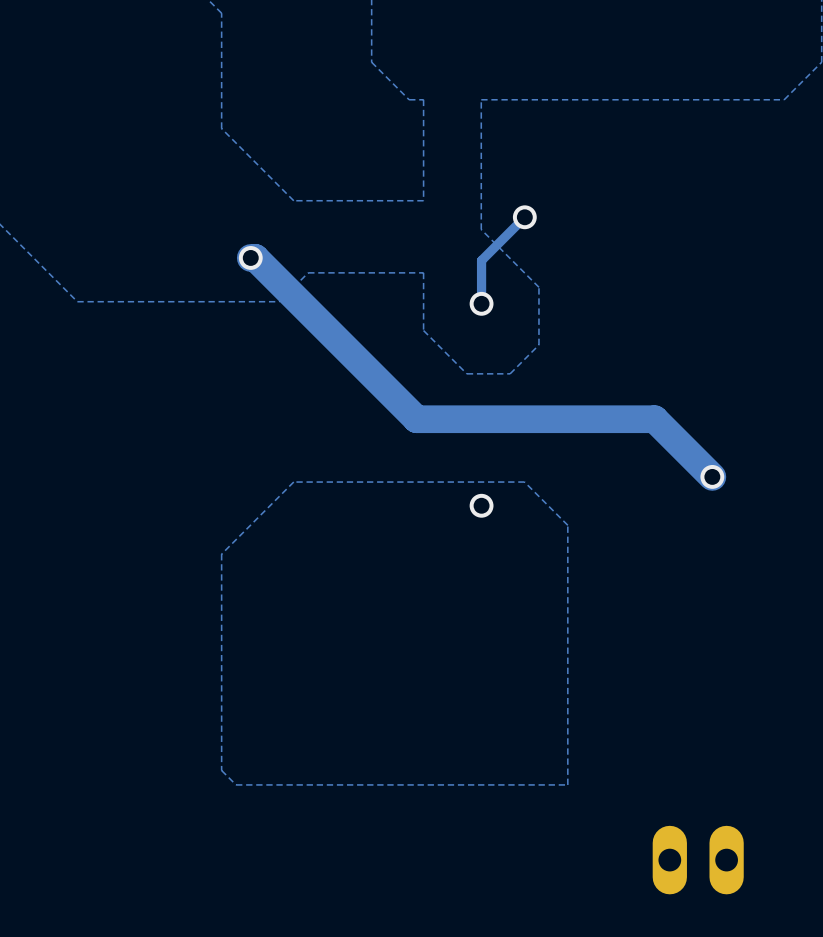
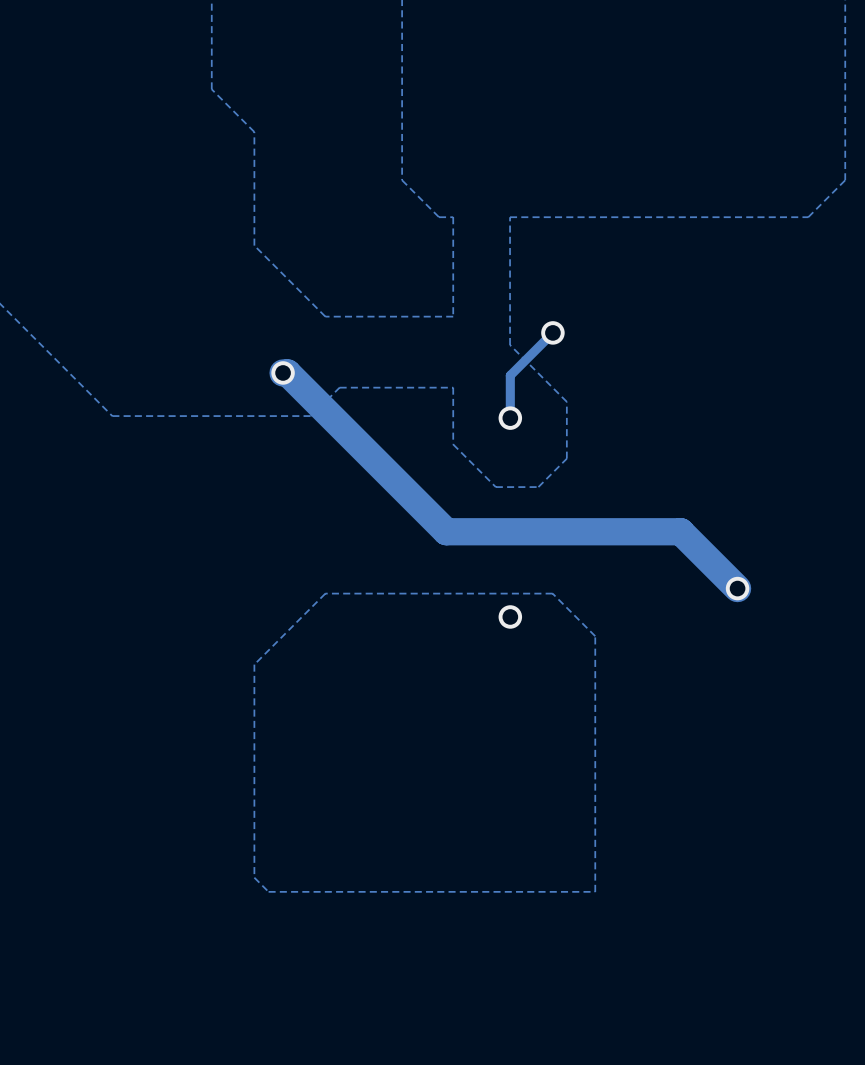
part: (698, 860) -> none

